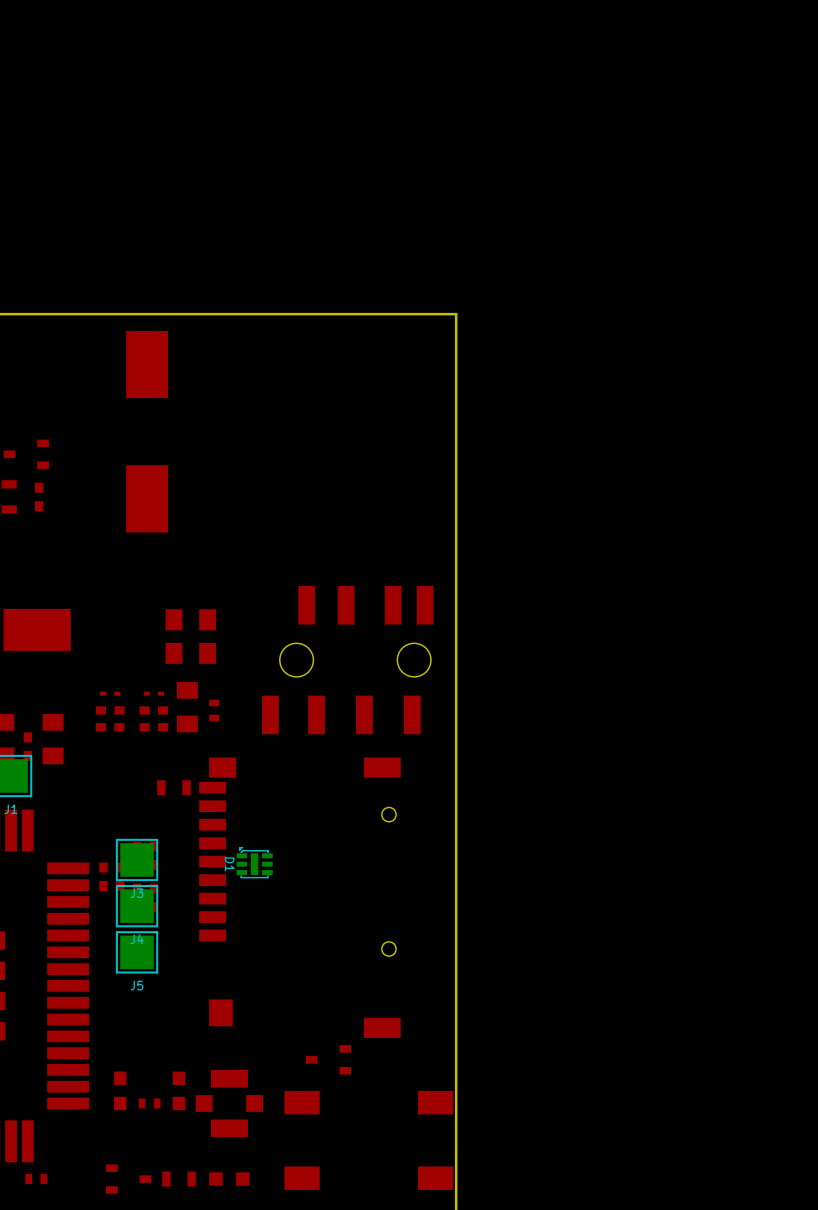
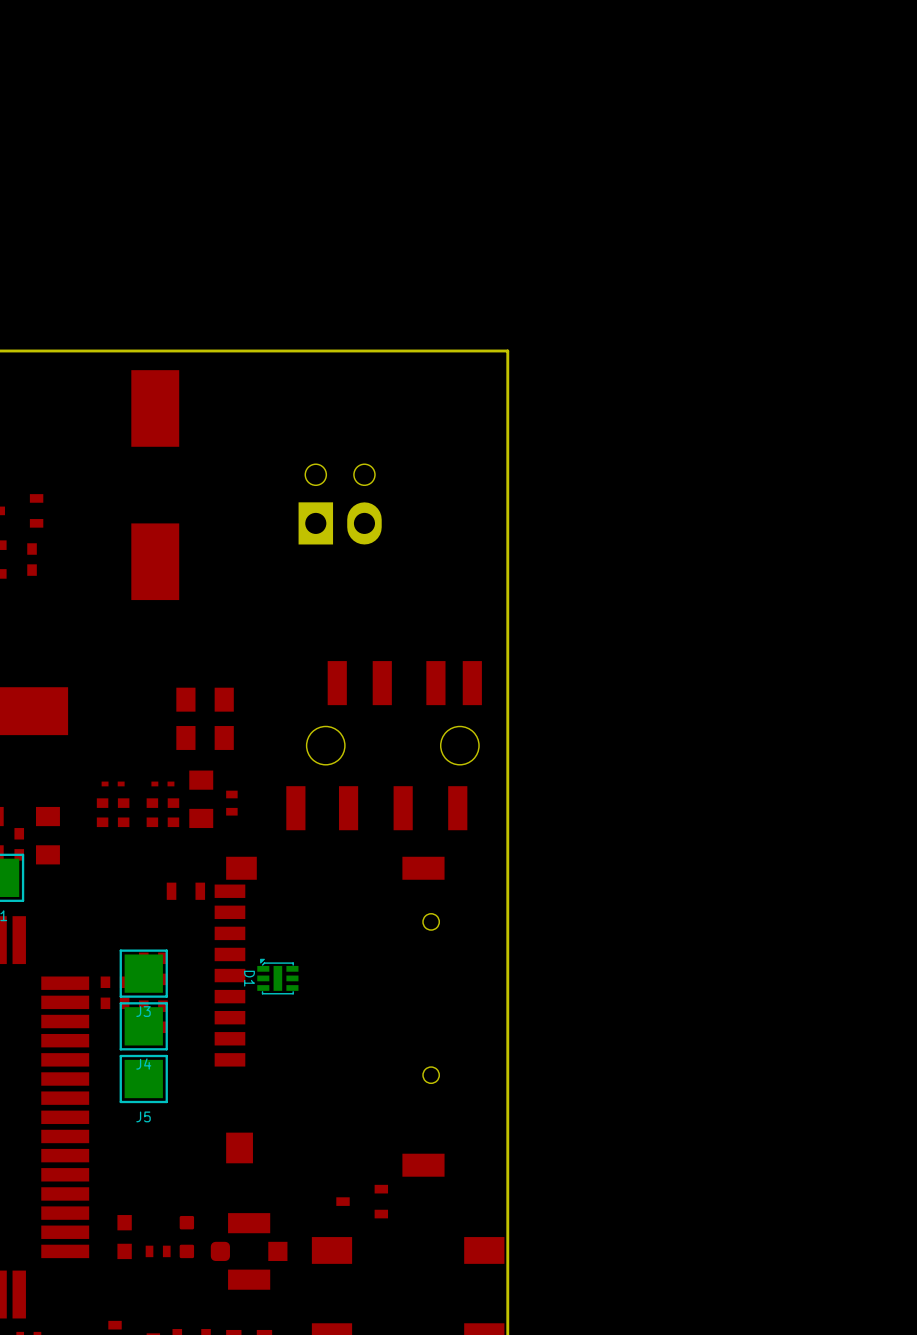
part: none -> (340, 504)
part footprint: [195, 1069, 264, 1138] -> [210, 1213, 288, 1290]
part footprint: [172, 1071, 186, 1111] -> [179, 1215, 195, 1259]

